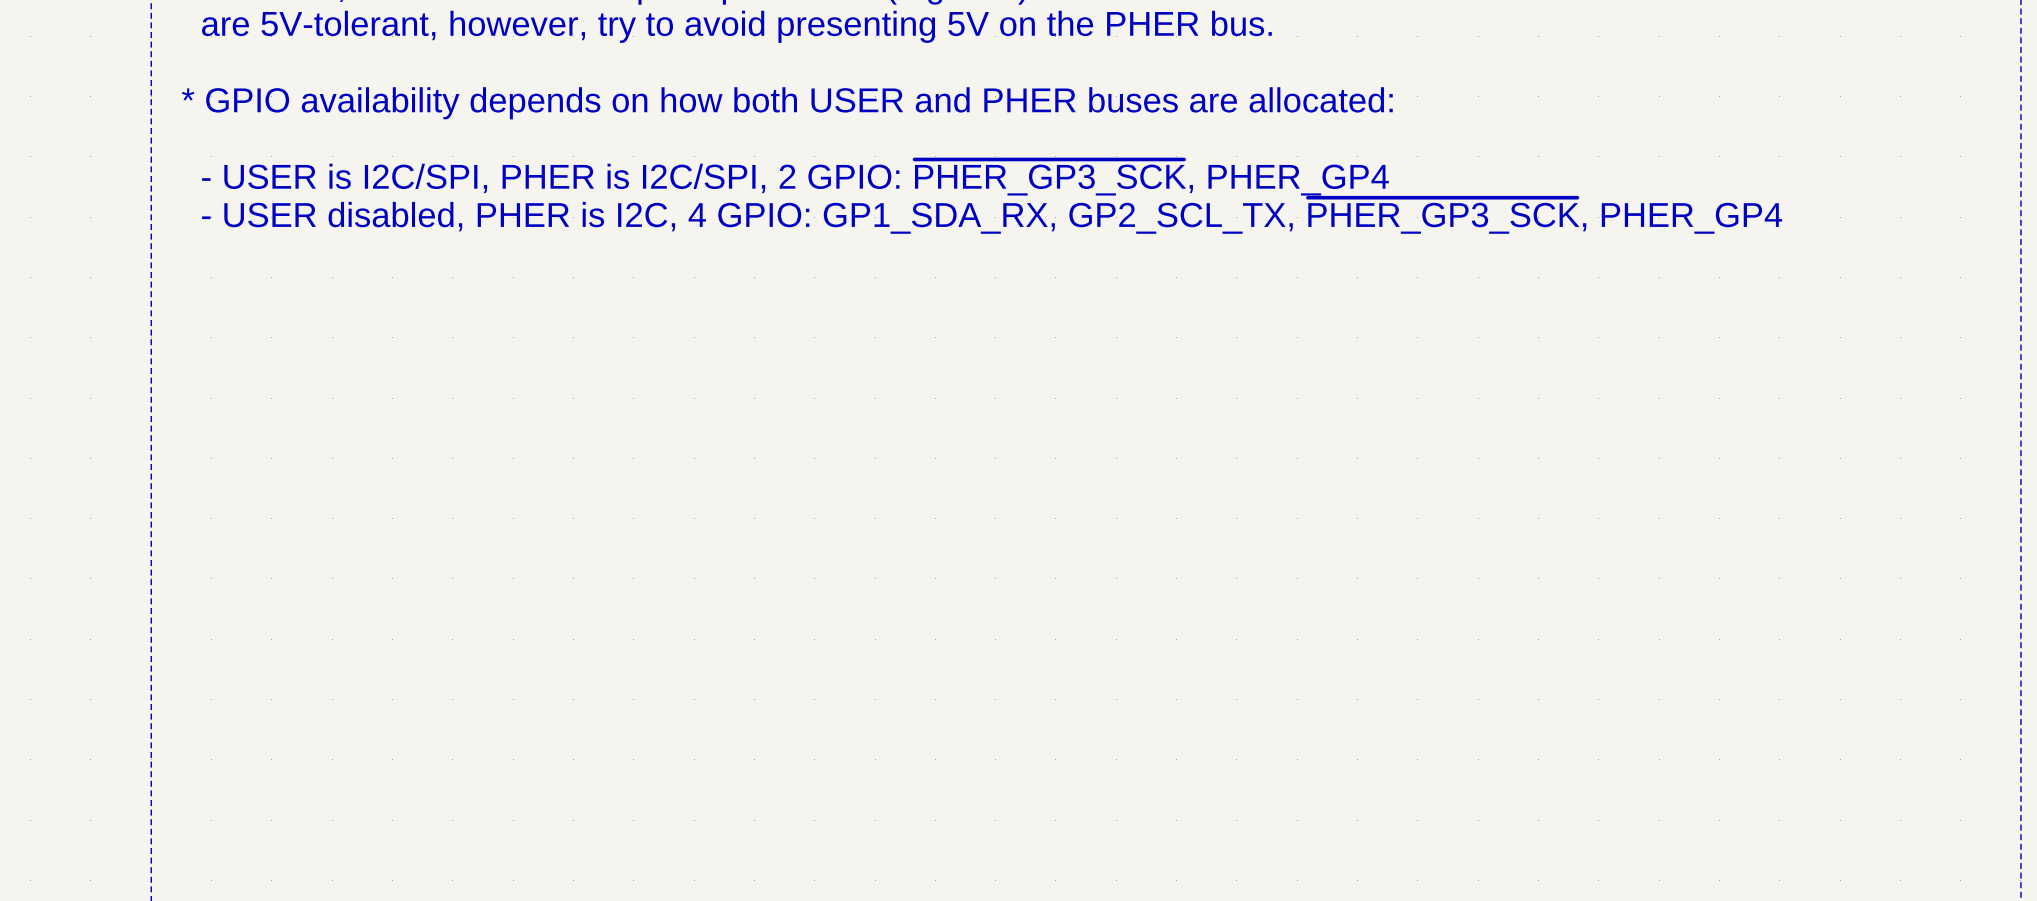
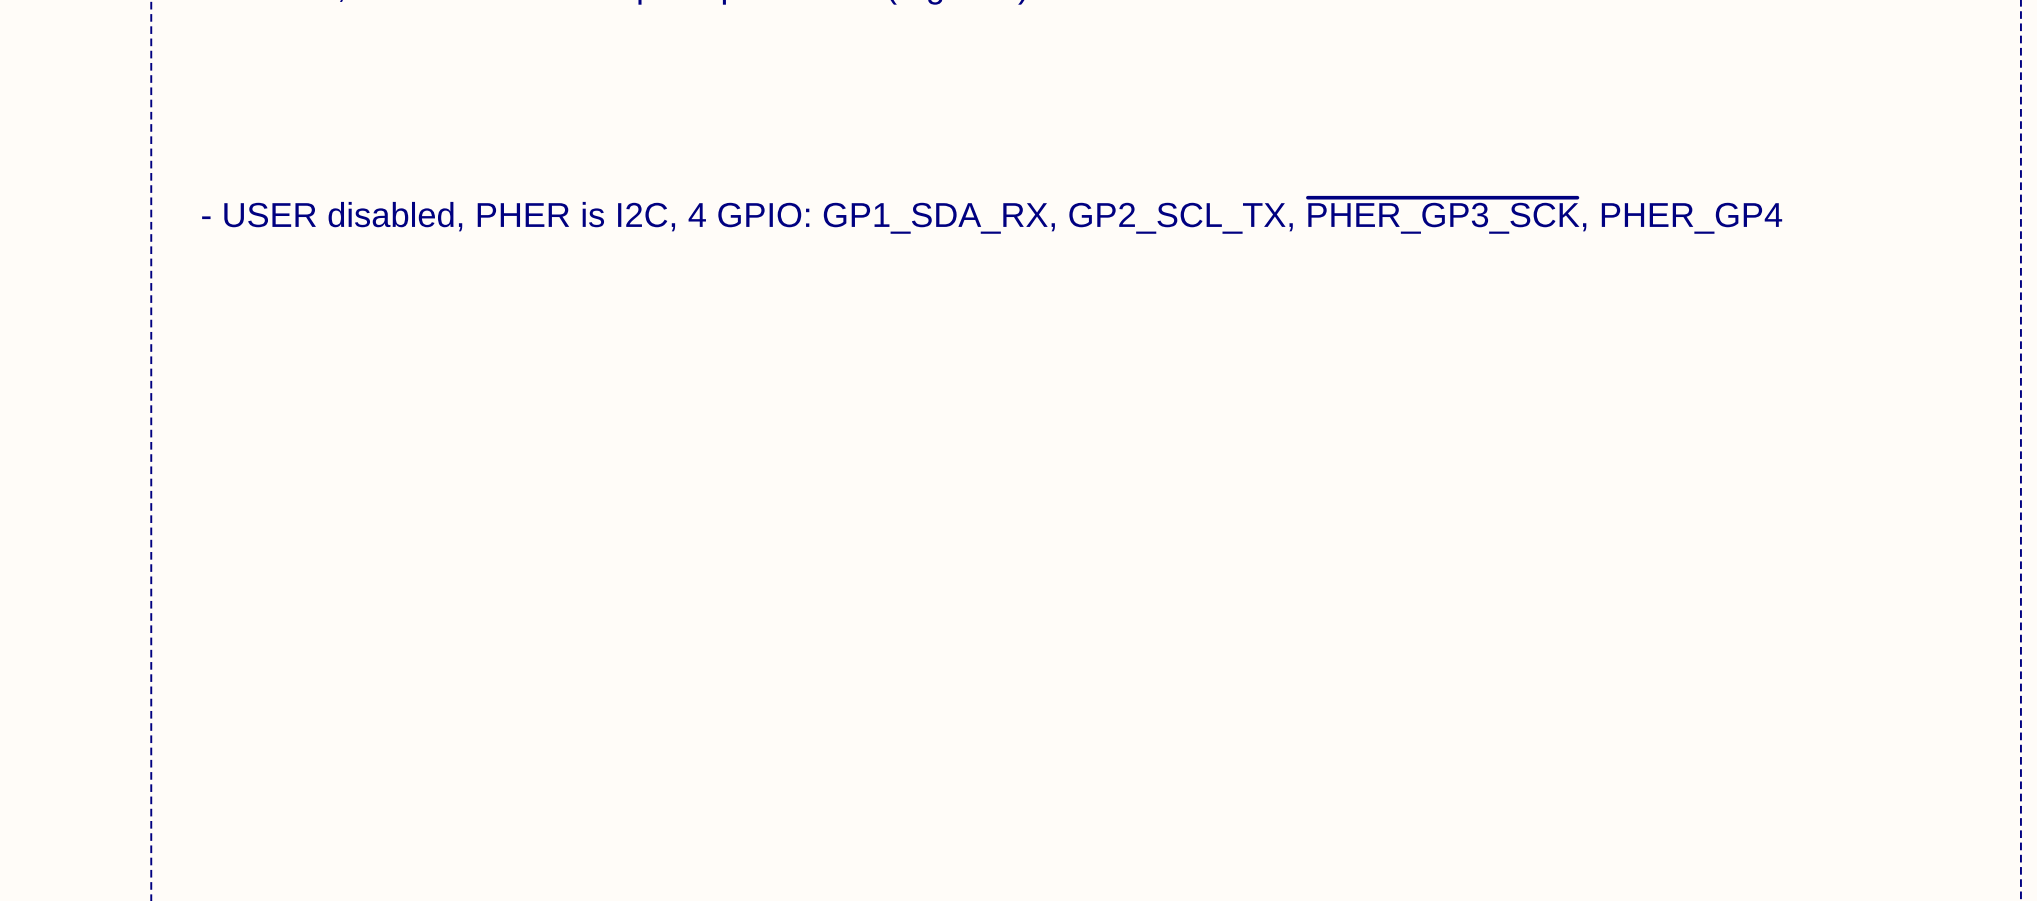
text: are 5V-tolerant, however, try to avoid presenting 5V on the PHER bus. (736, 26) -> none
text: * GPIO availability depends on how both USER and PHER buses are allocated: (787, 103) -> none
text: - USER is I2C/SPI, PHER is I2C/SPI, 2 GPIO: ~{PHER_GP3_SCK}, PHER_GP4 (795, 177) -> none

